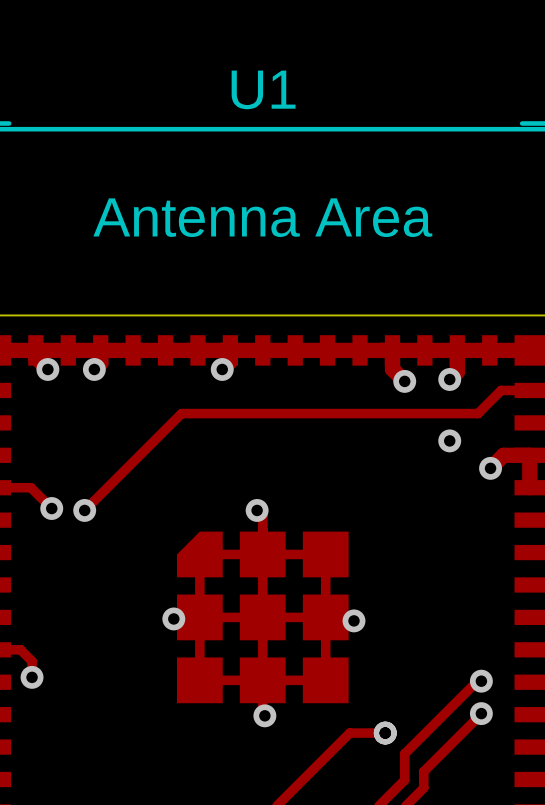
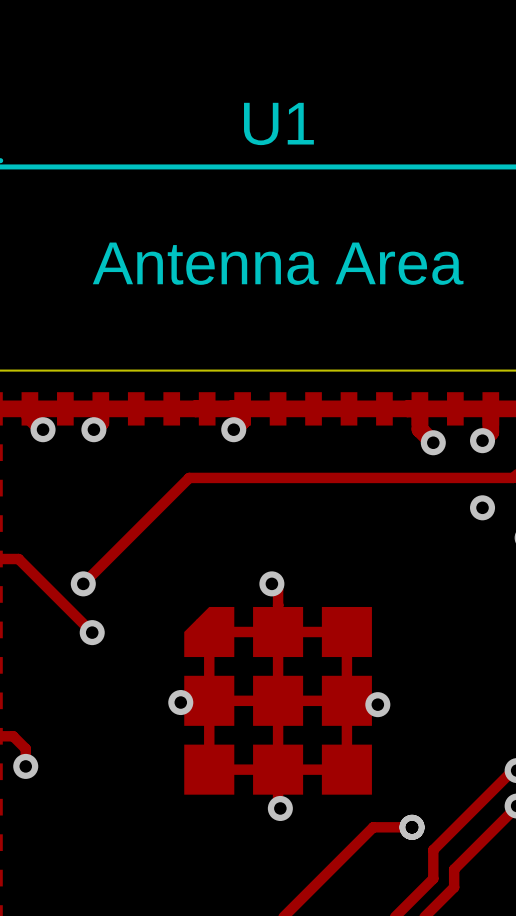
track: (25, 487) (30, 487) (51, 508) -> (18, 559) (92, 632)
via position: (51, 508) -> (92, 632)

